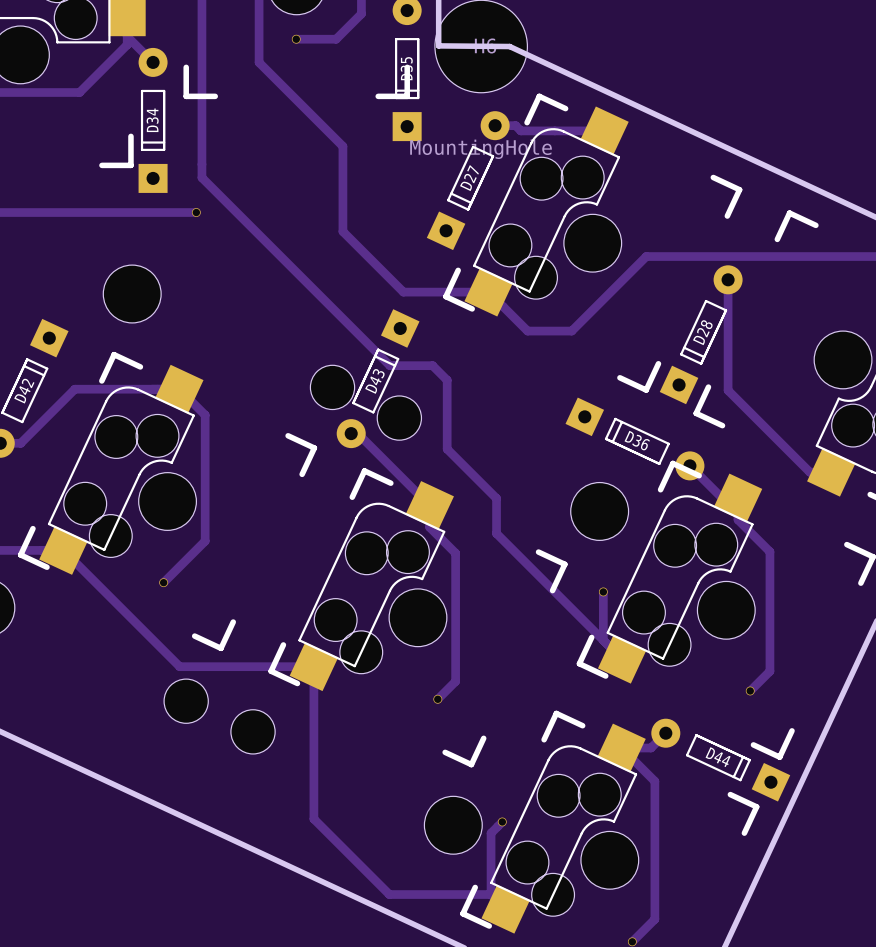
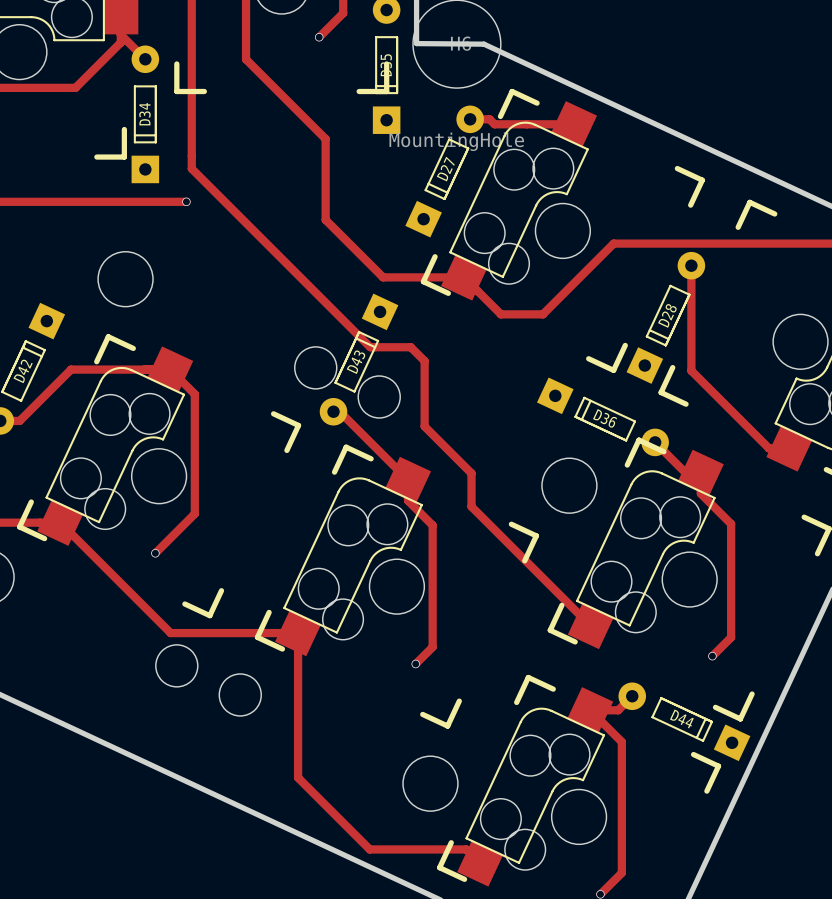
track: (296, 39) (336, 39) -> none
via position: (296, 39) -> (319, 37)
track: (603, 591) (603, 640) -> none
via: (603, 591) -> none
track: (502, 821) (491, 833) (491, 894) -> none
via: (502, 821) -> none

